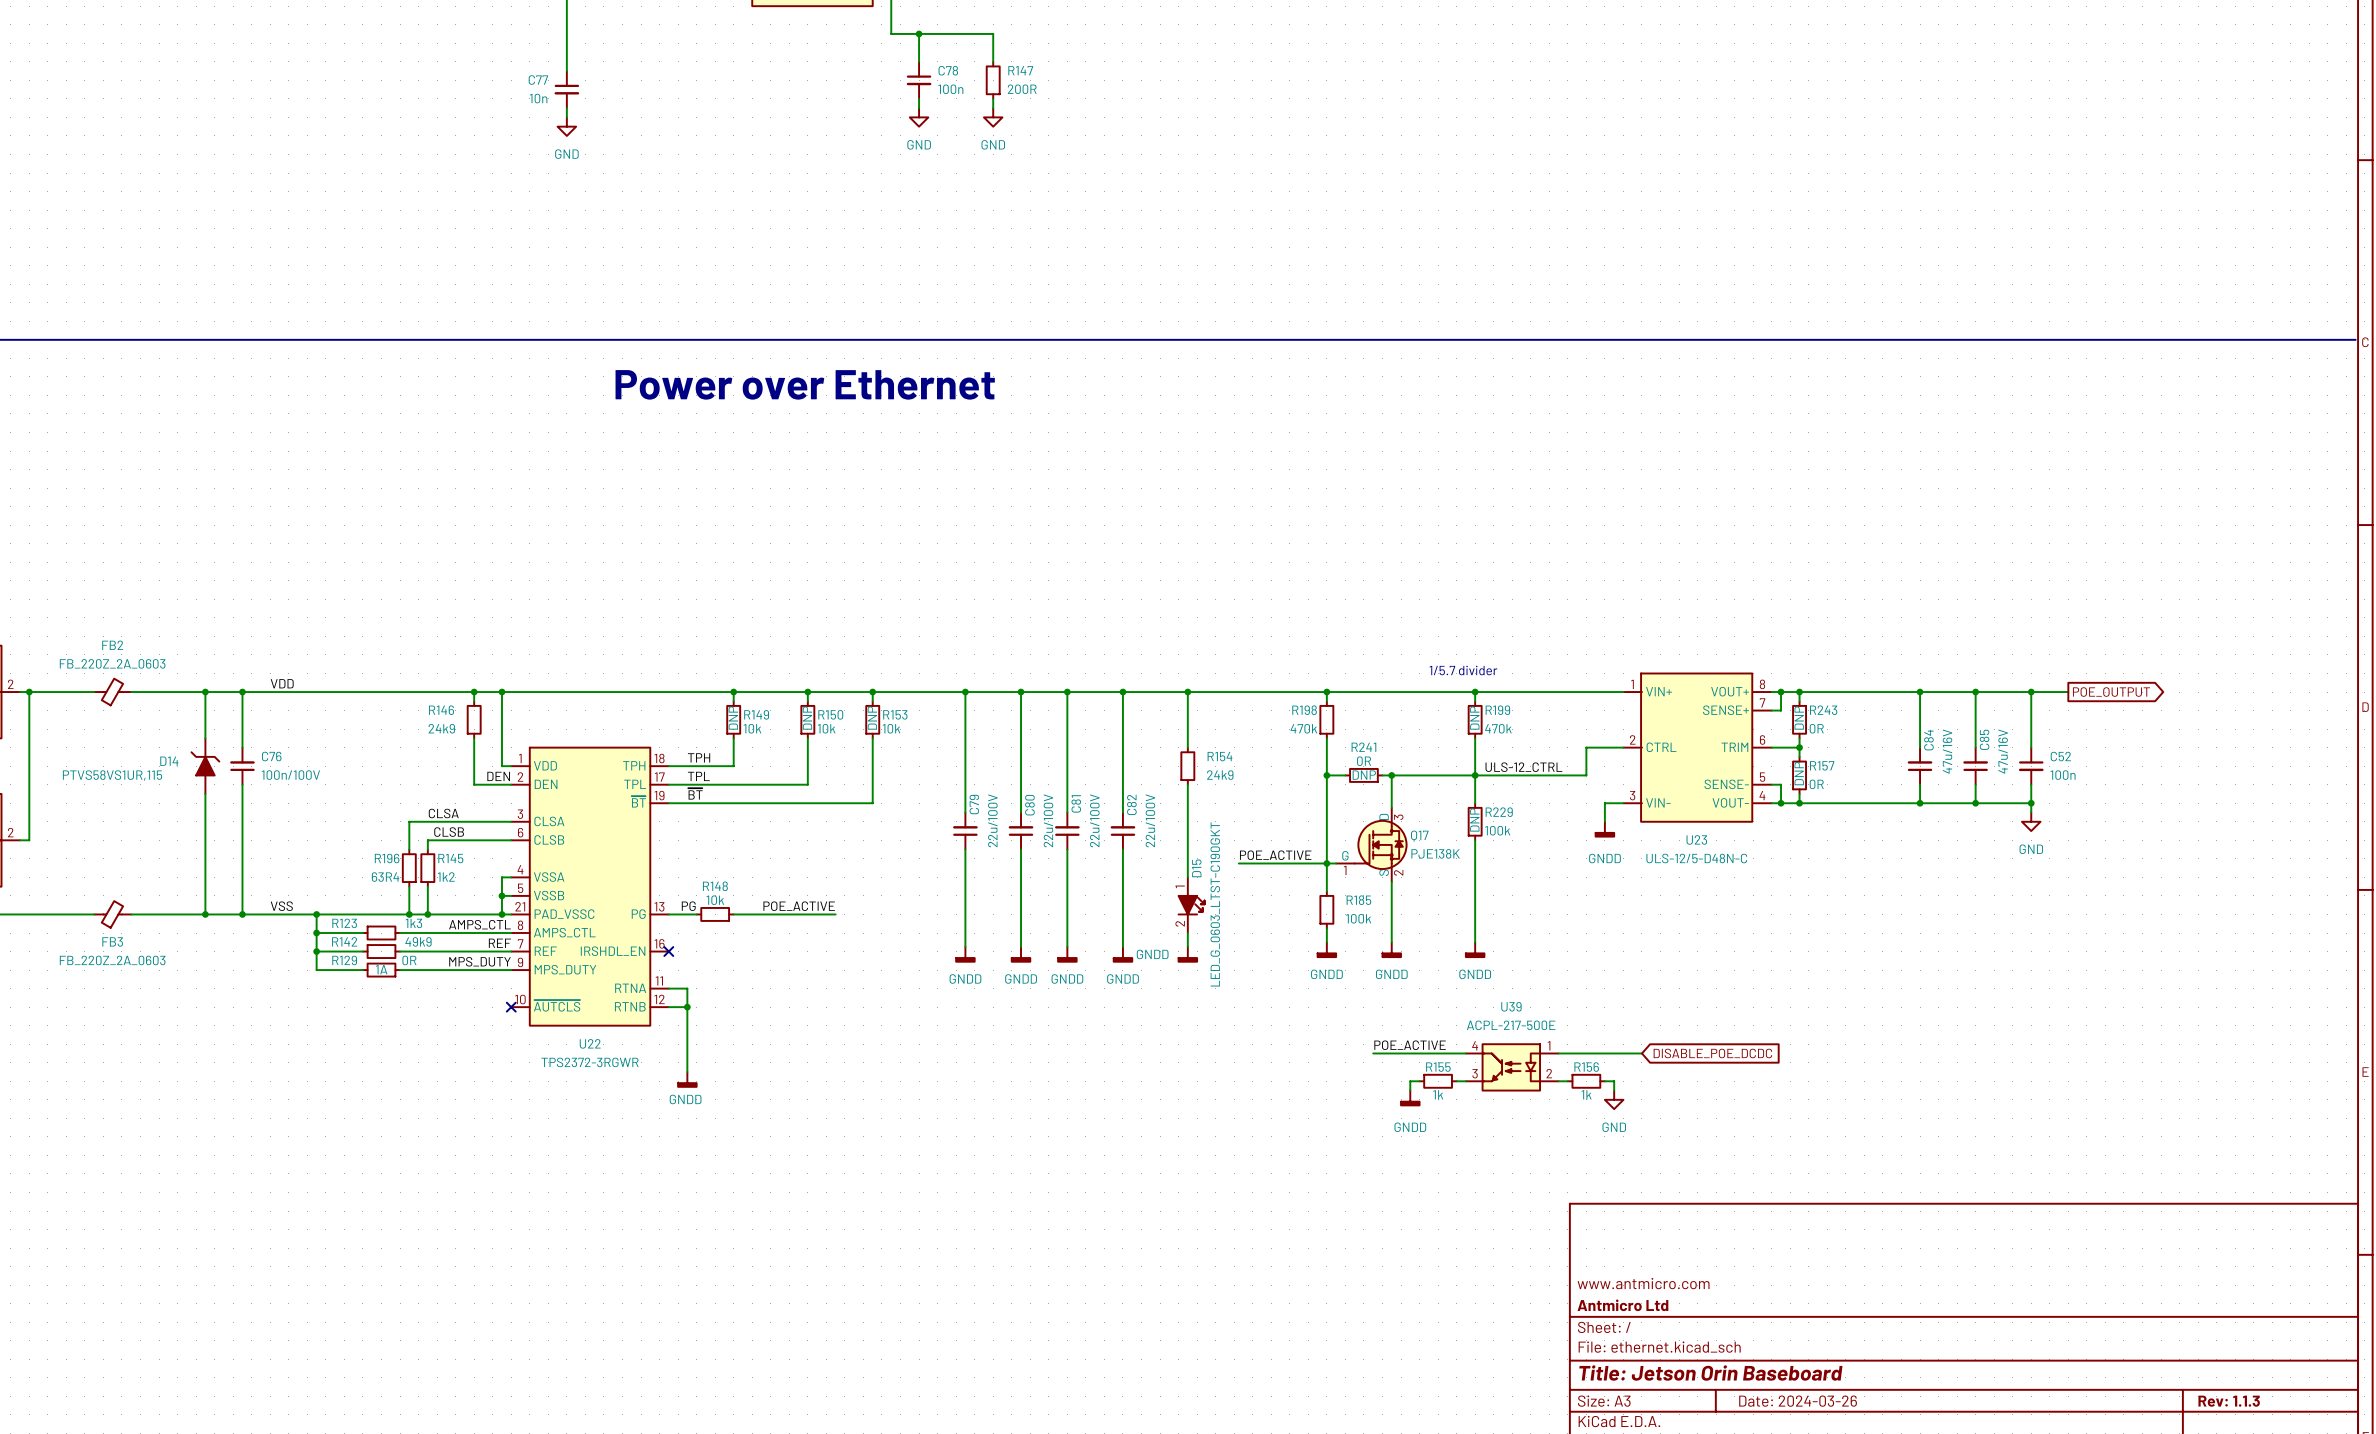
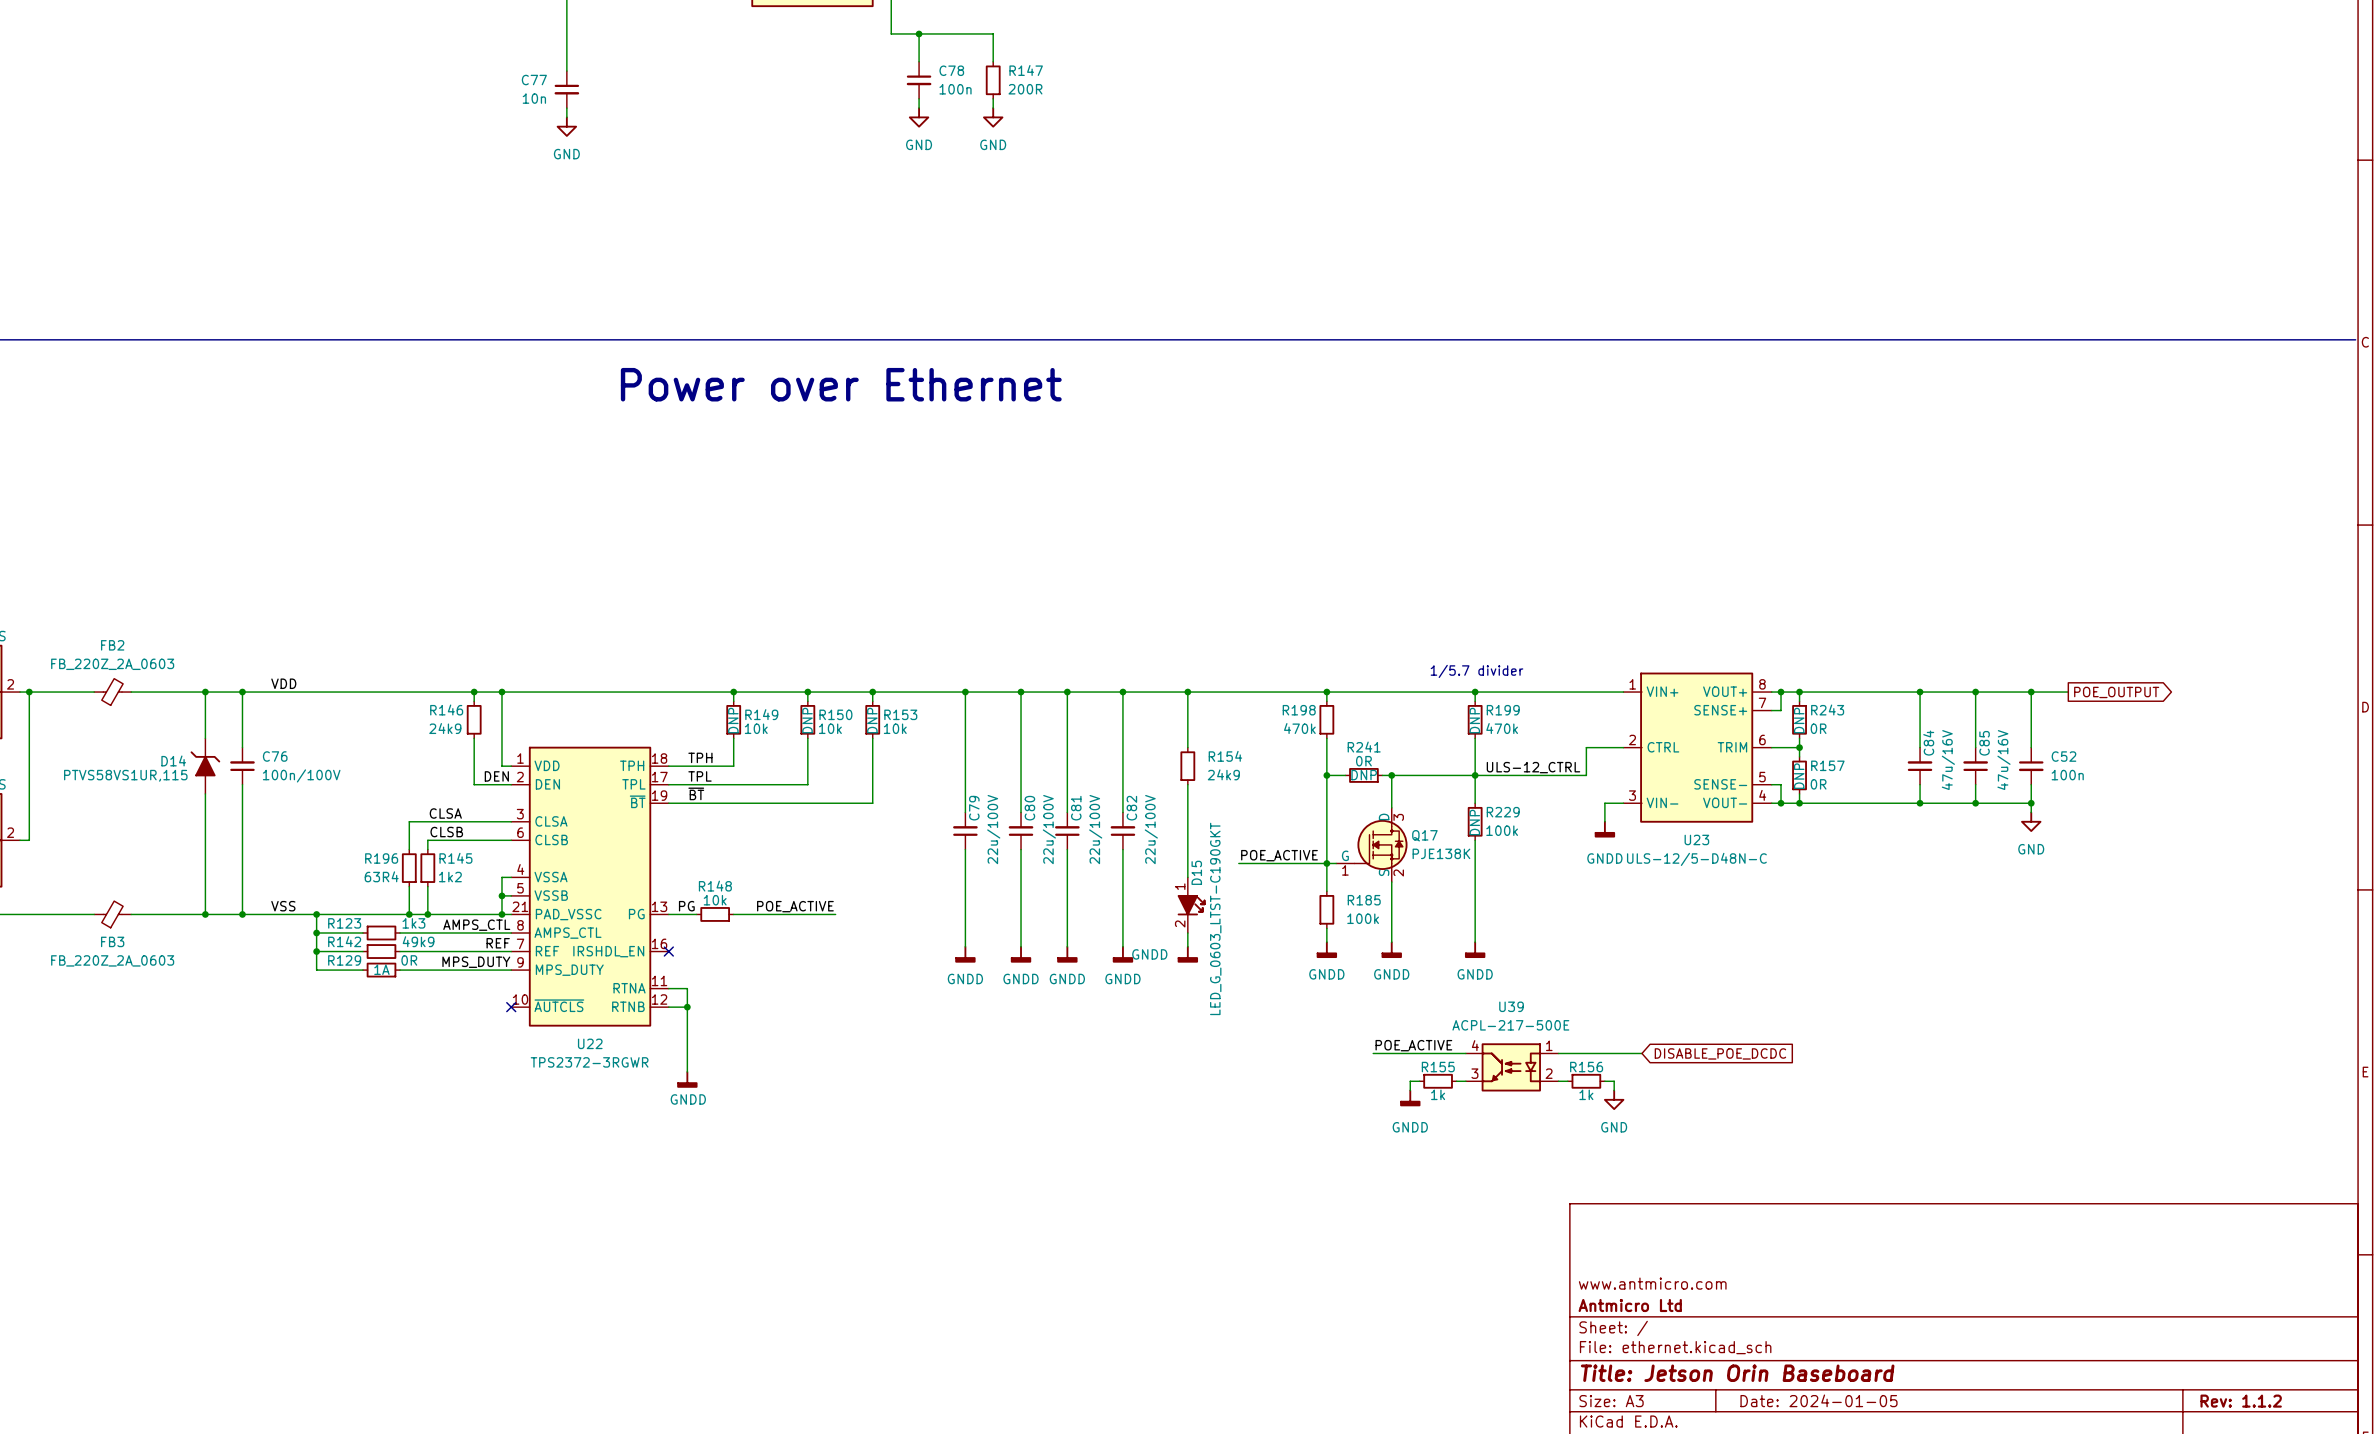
title block: Date: 2024-03-26 (1798, 1401) -> Date: 2024-01-05 (1819, 1400)
title block: Rev: 1.1.3 (2229, 1401) -> Rev: 1.1.2 (2241, 1401)

